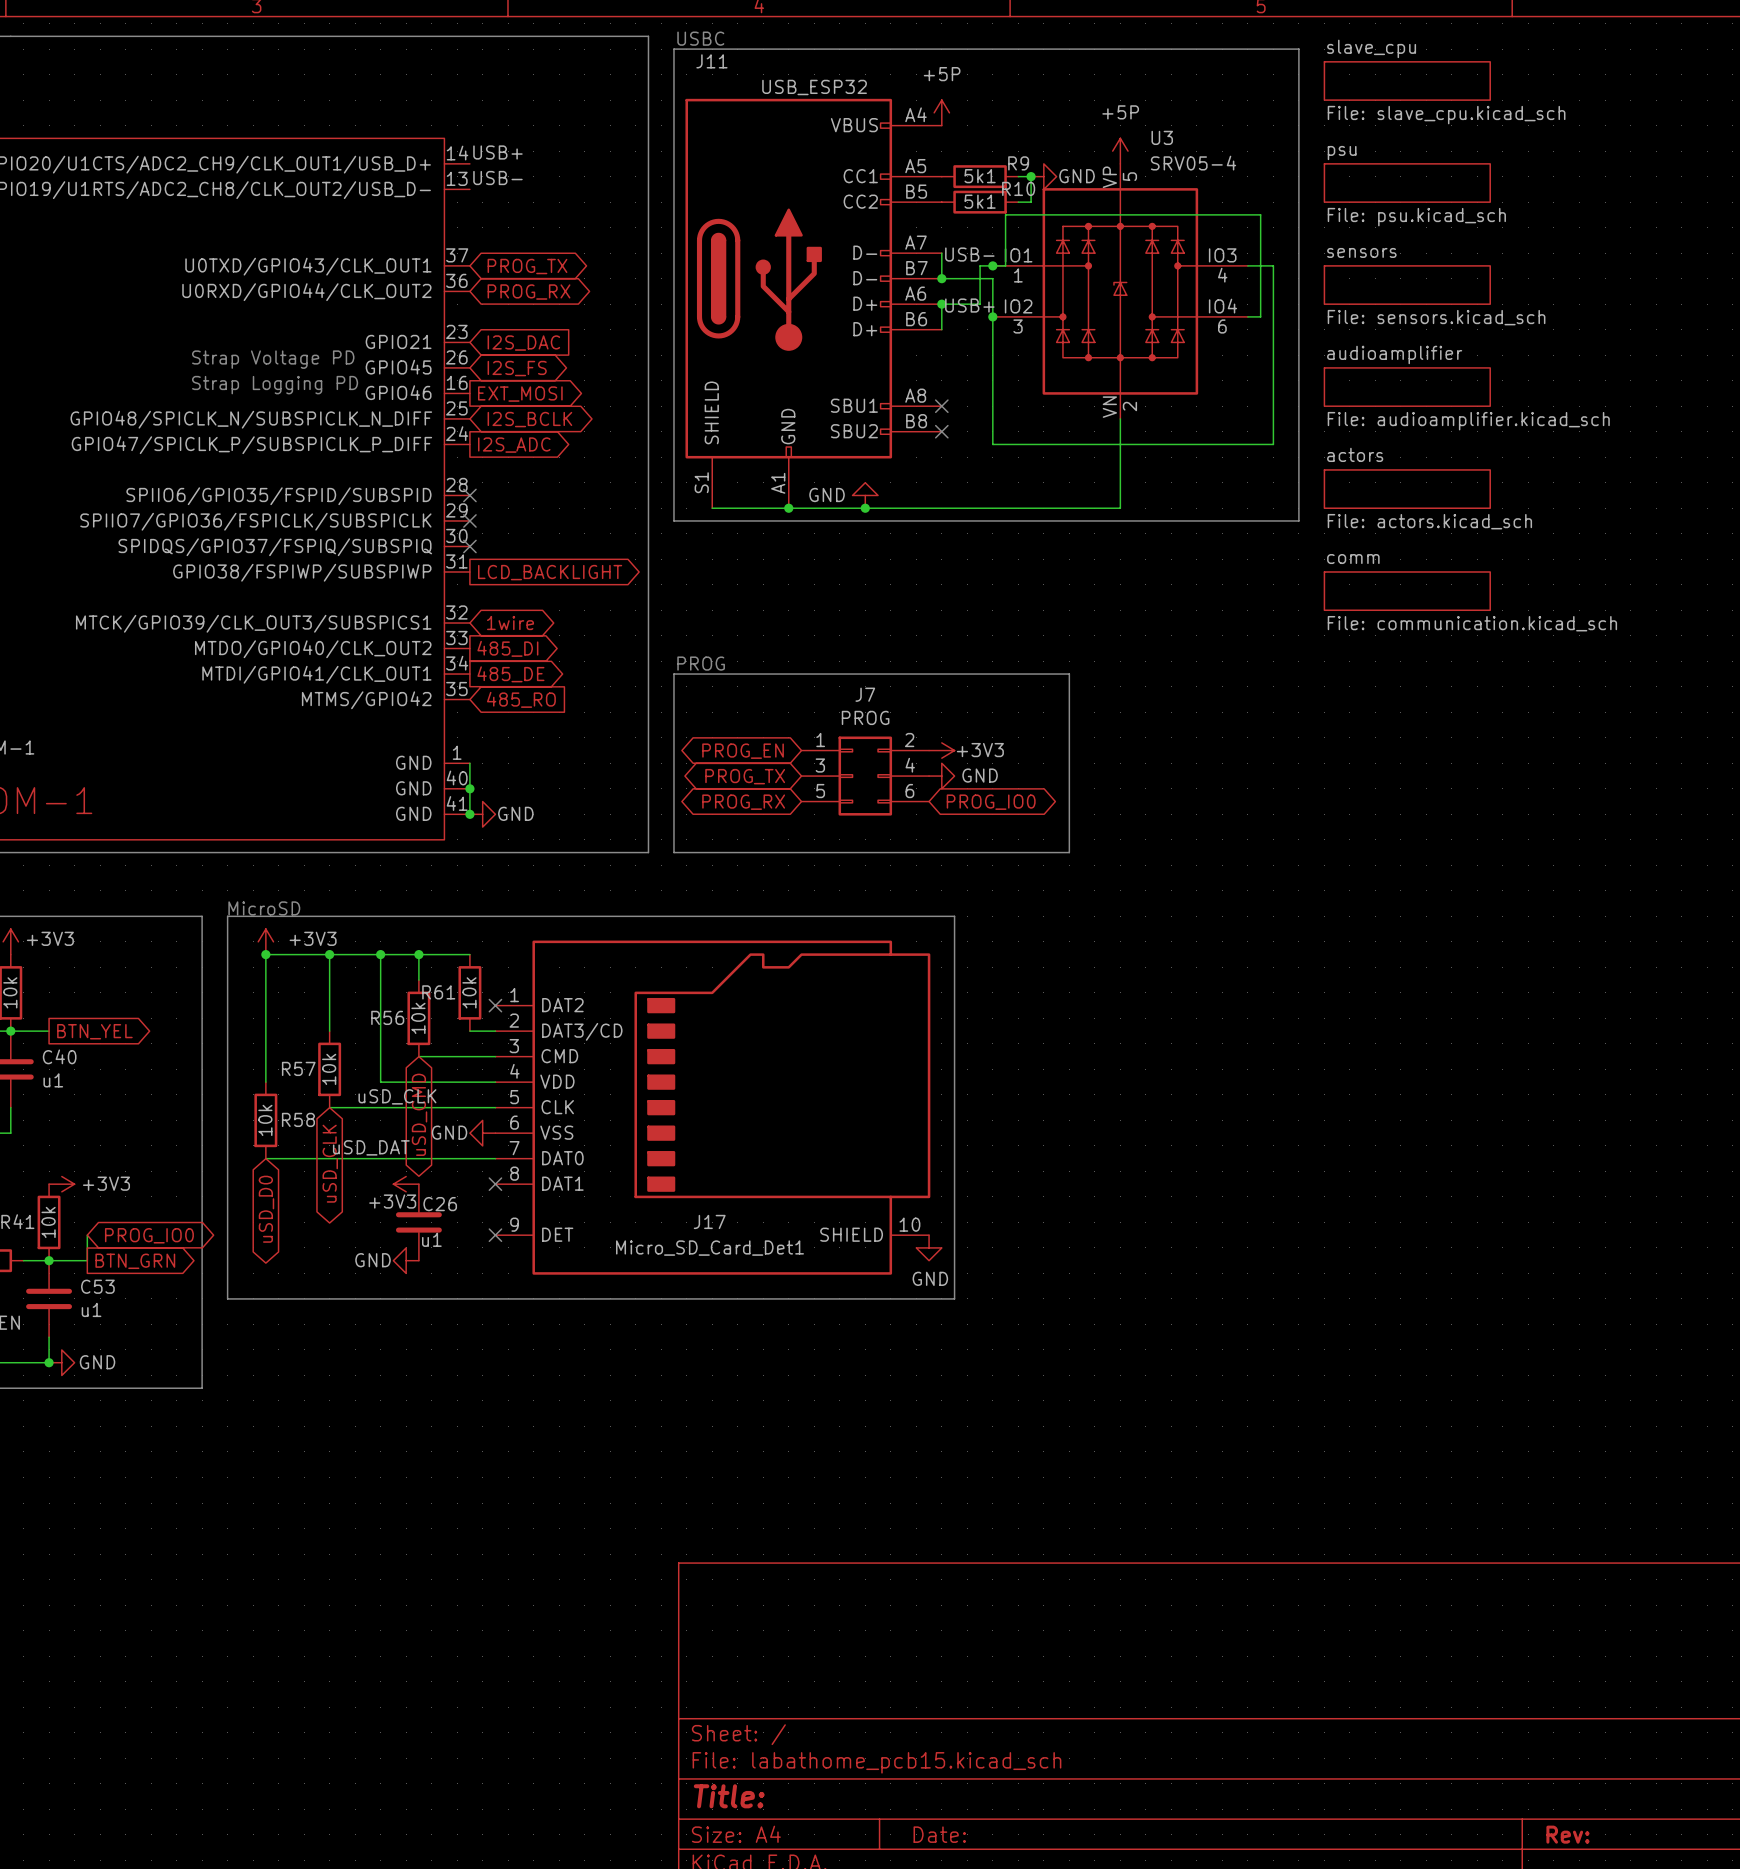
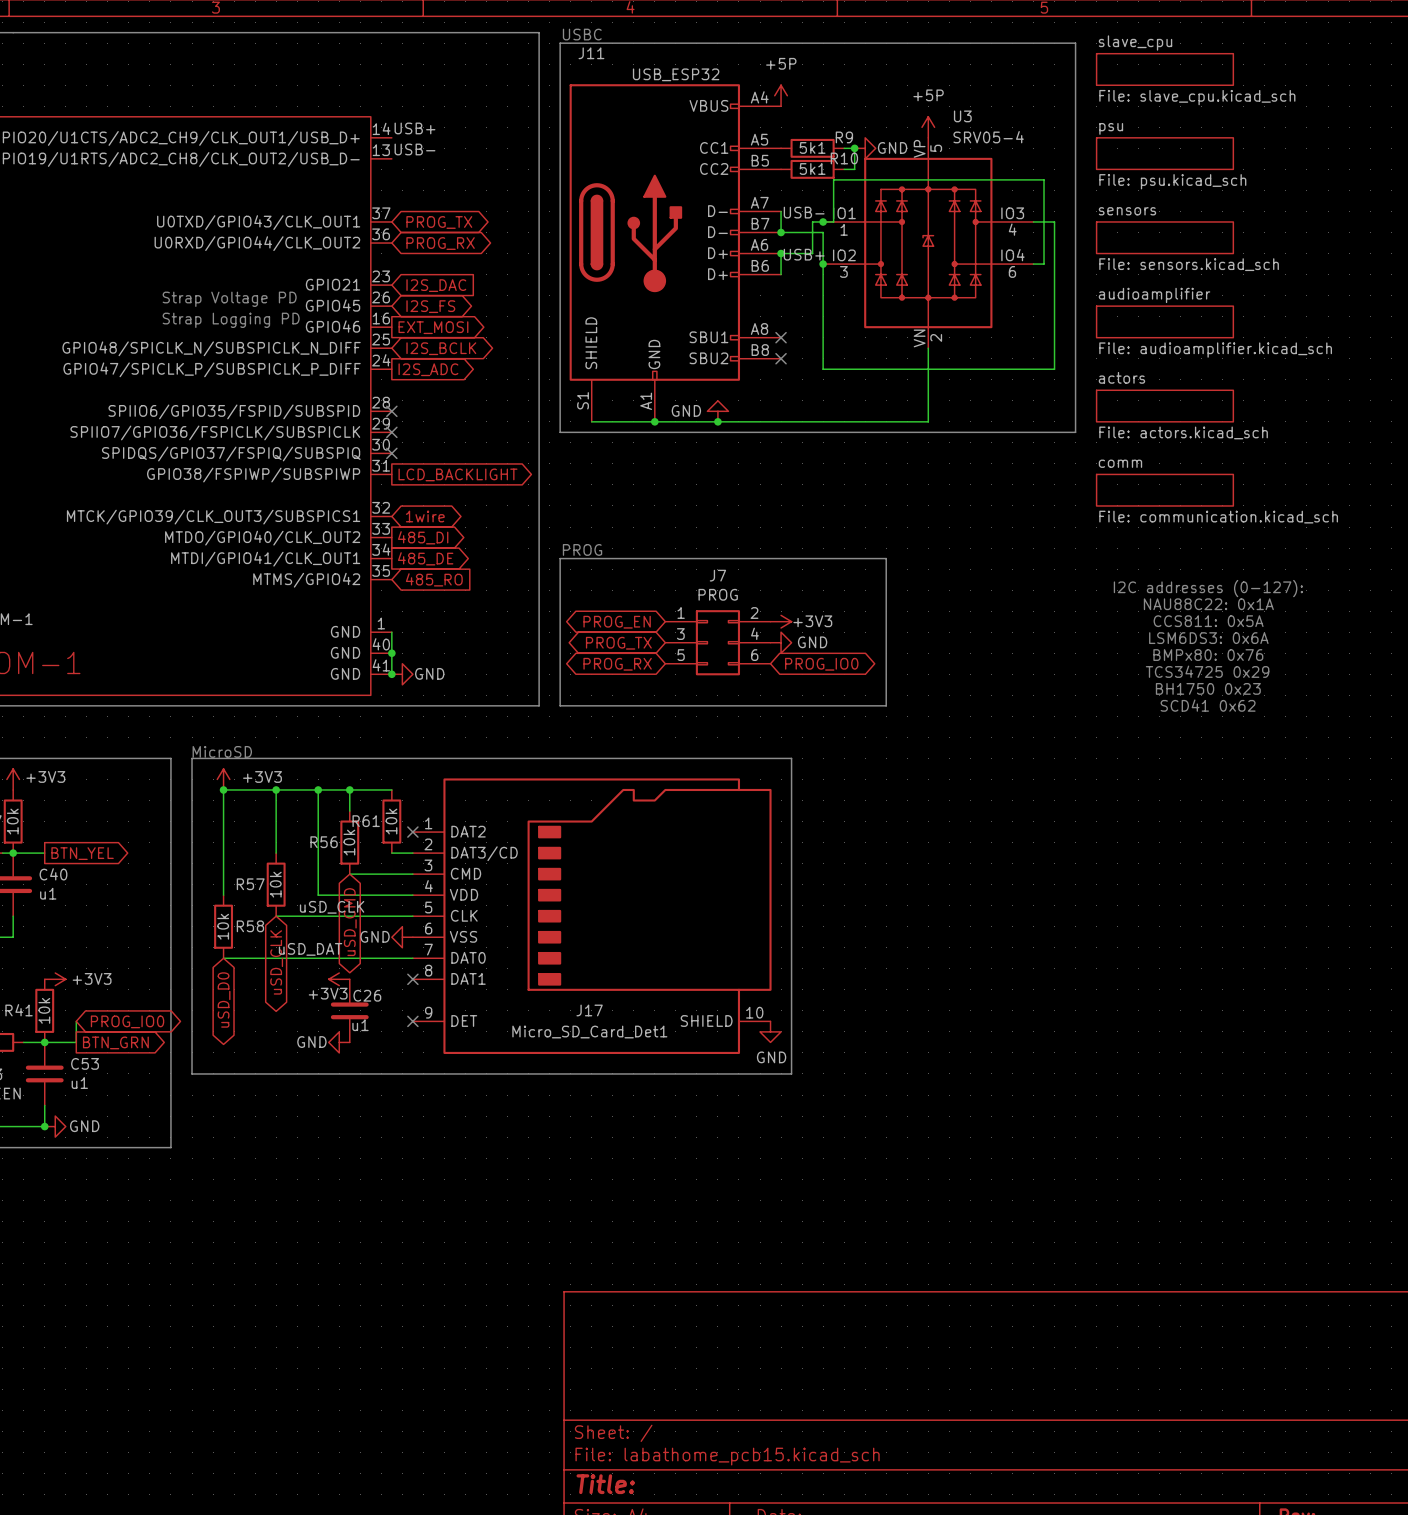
text: none -> I2C addresses (0-127): (1208, 588)
text: none -> NAU88C22: 0x1A (1208, 604)
text: none -> CCS811: 0x5A (1208, 621)
text: none -> LSM6DS3: 0x6A (1208, 638)
text: none -> BMPx80: 0x76 (1208, 655)
text: none -> TCS34725 0x29 (1207, 671)
text: none -> BH1750 0x23 (1208, 688)
text: none -> SCD41 0x62 (1208, 705)

